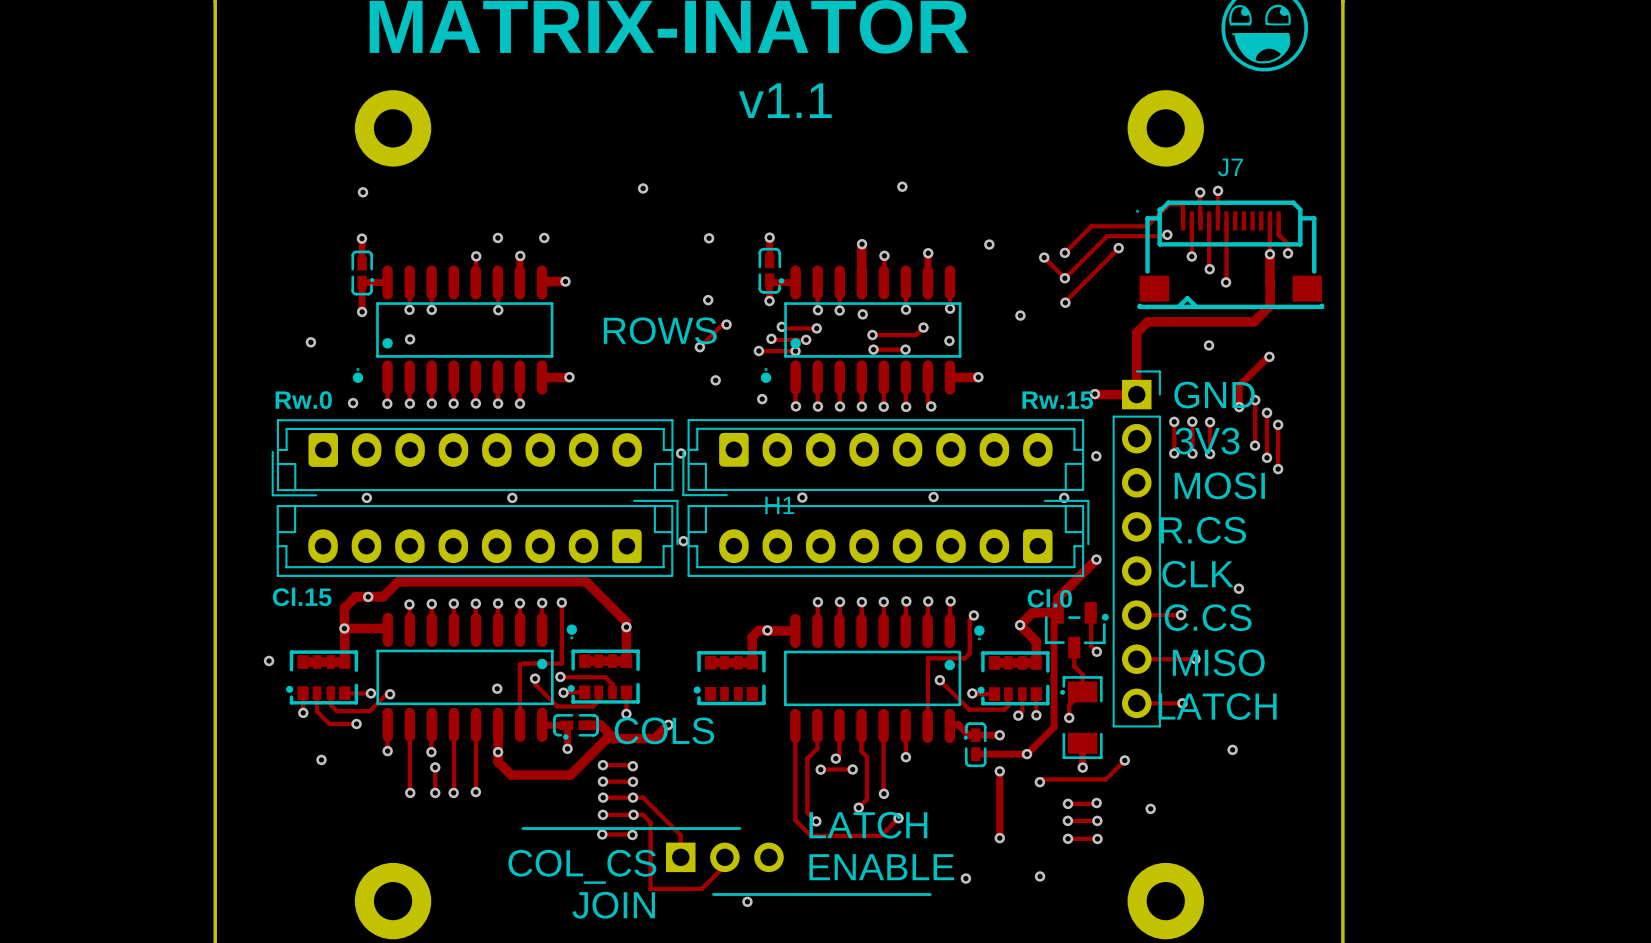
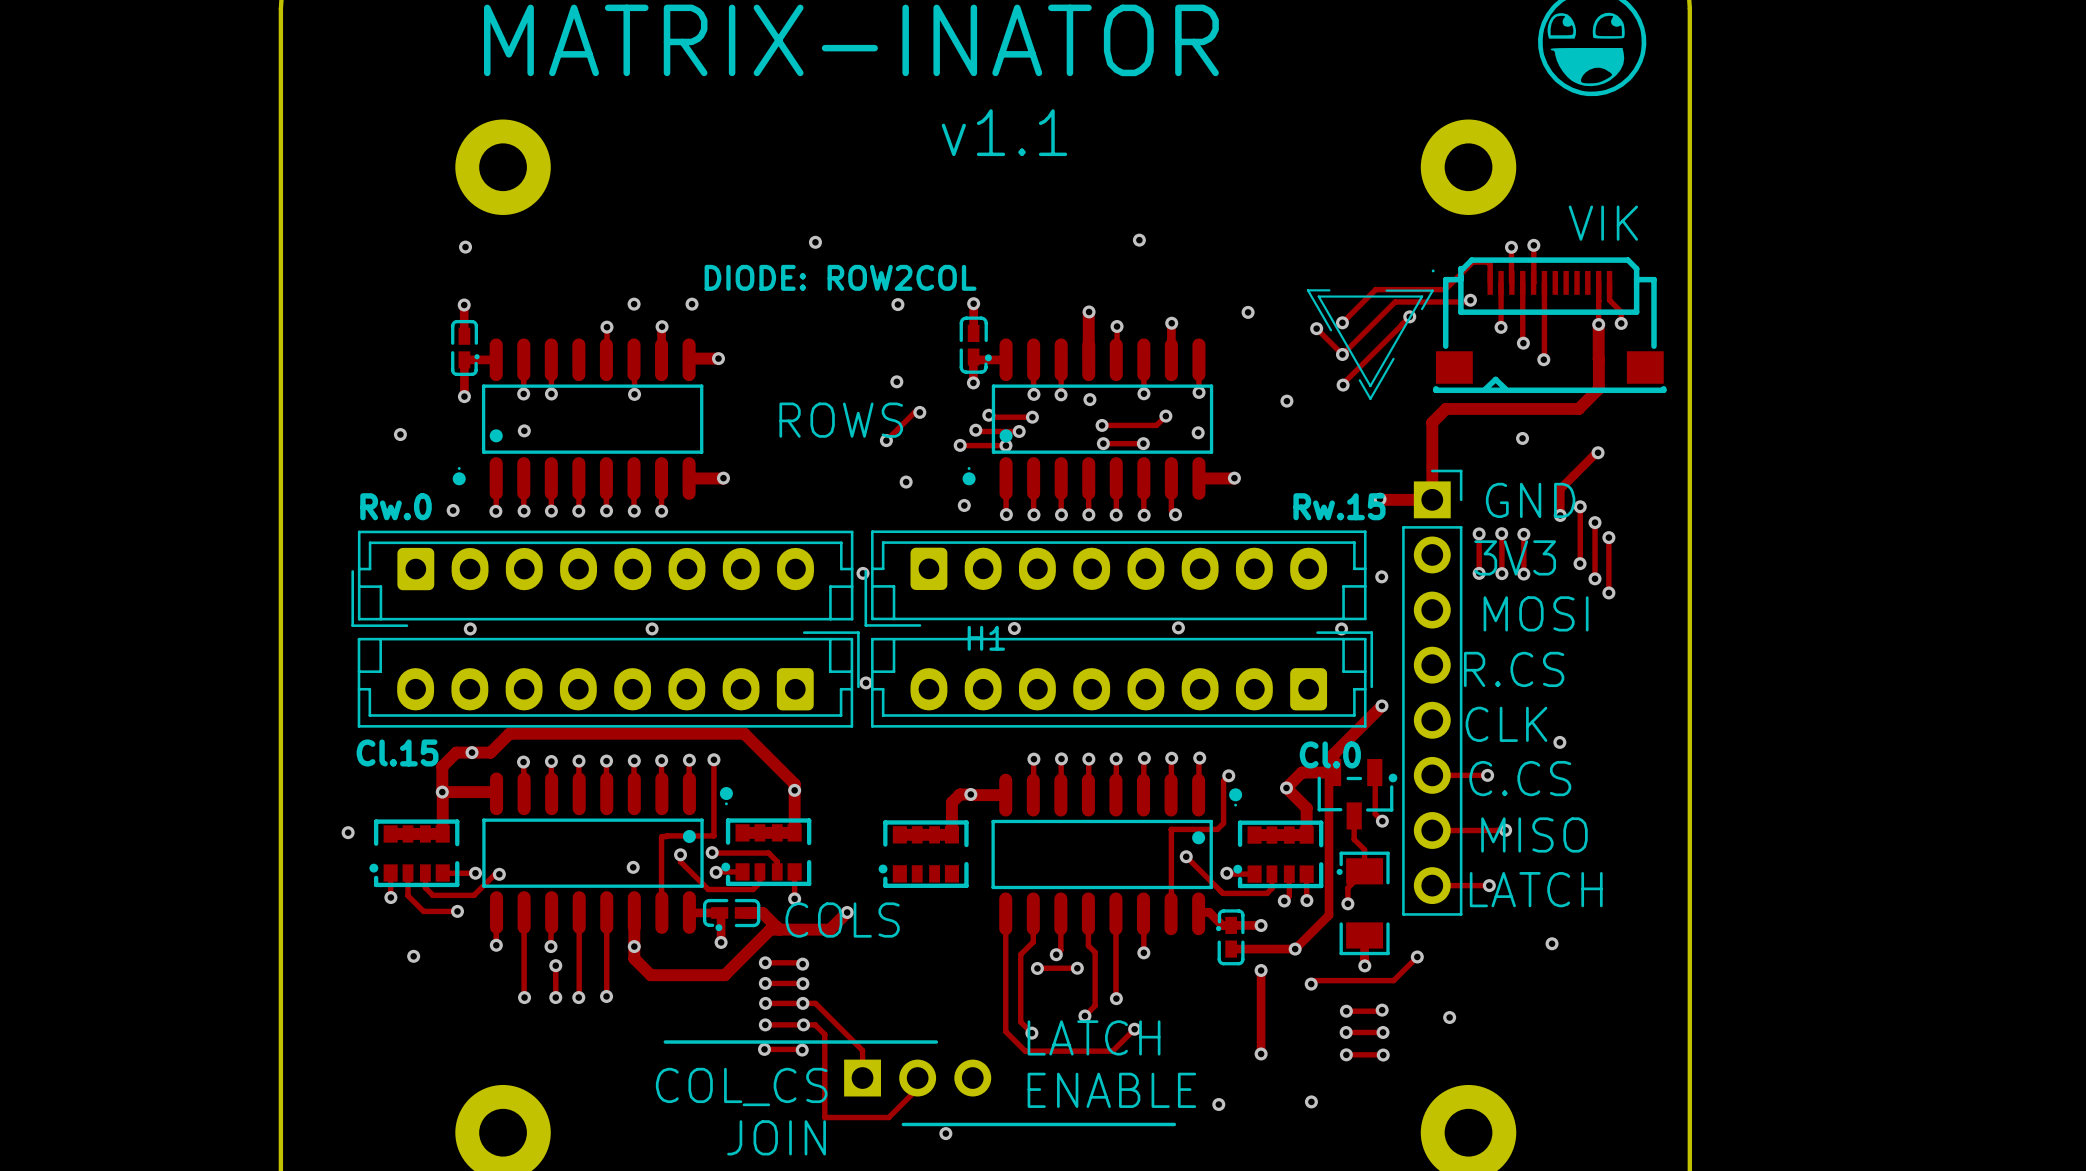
J7 name: J7 (1230, 167) -> none
text: none -> VIK (1603, 223)
text: none -> DIODE: ROW2COL (840, 277)
drawing: none -> [1306, 289, 1434, 400]

